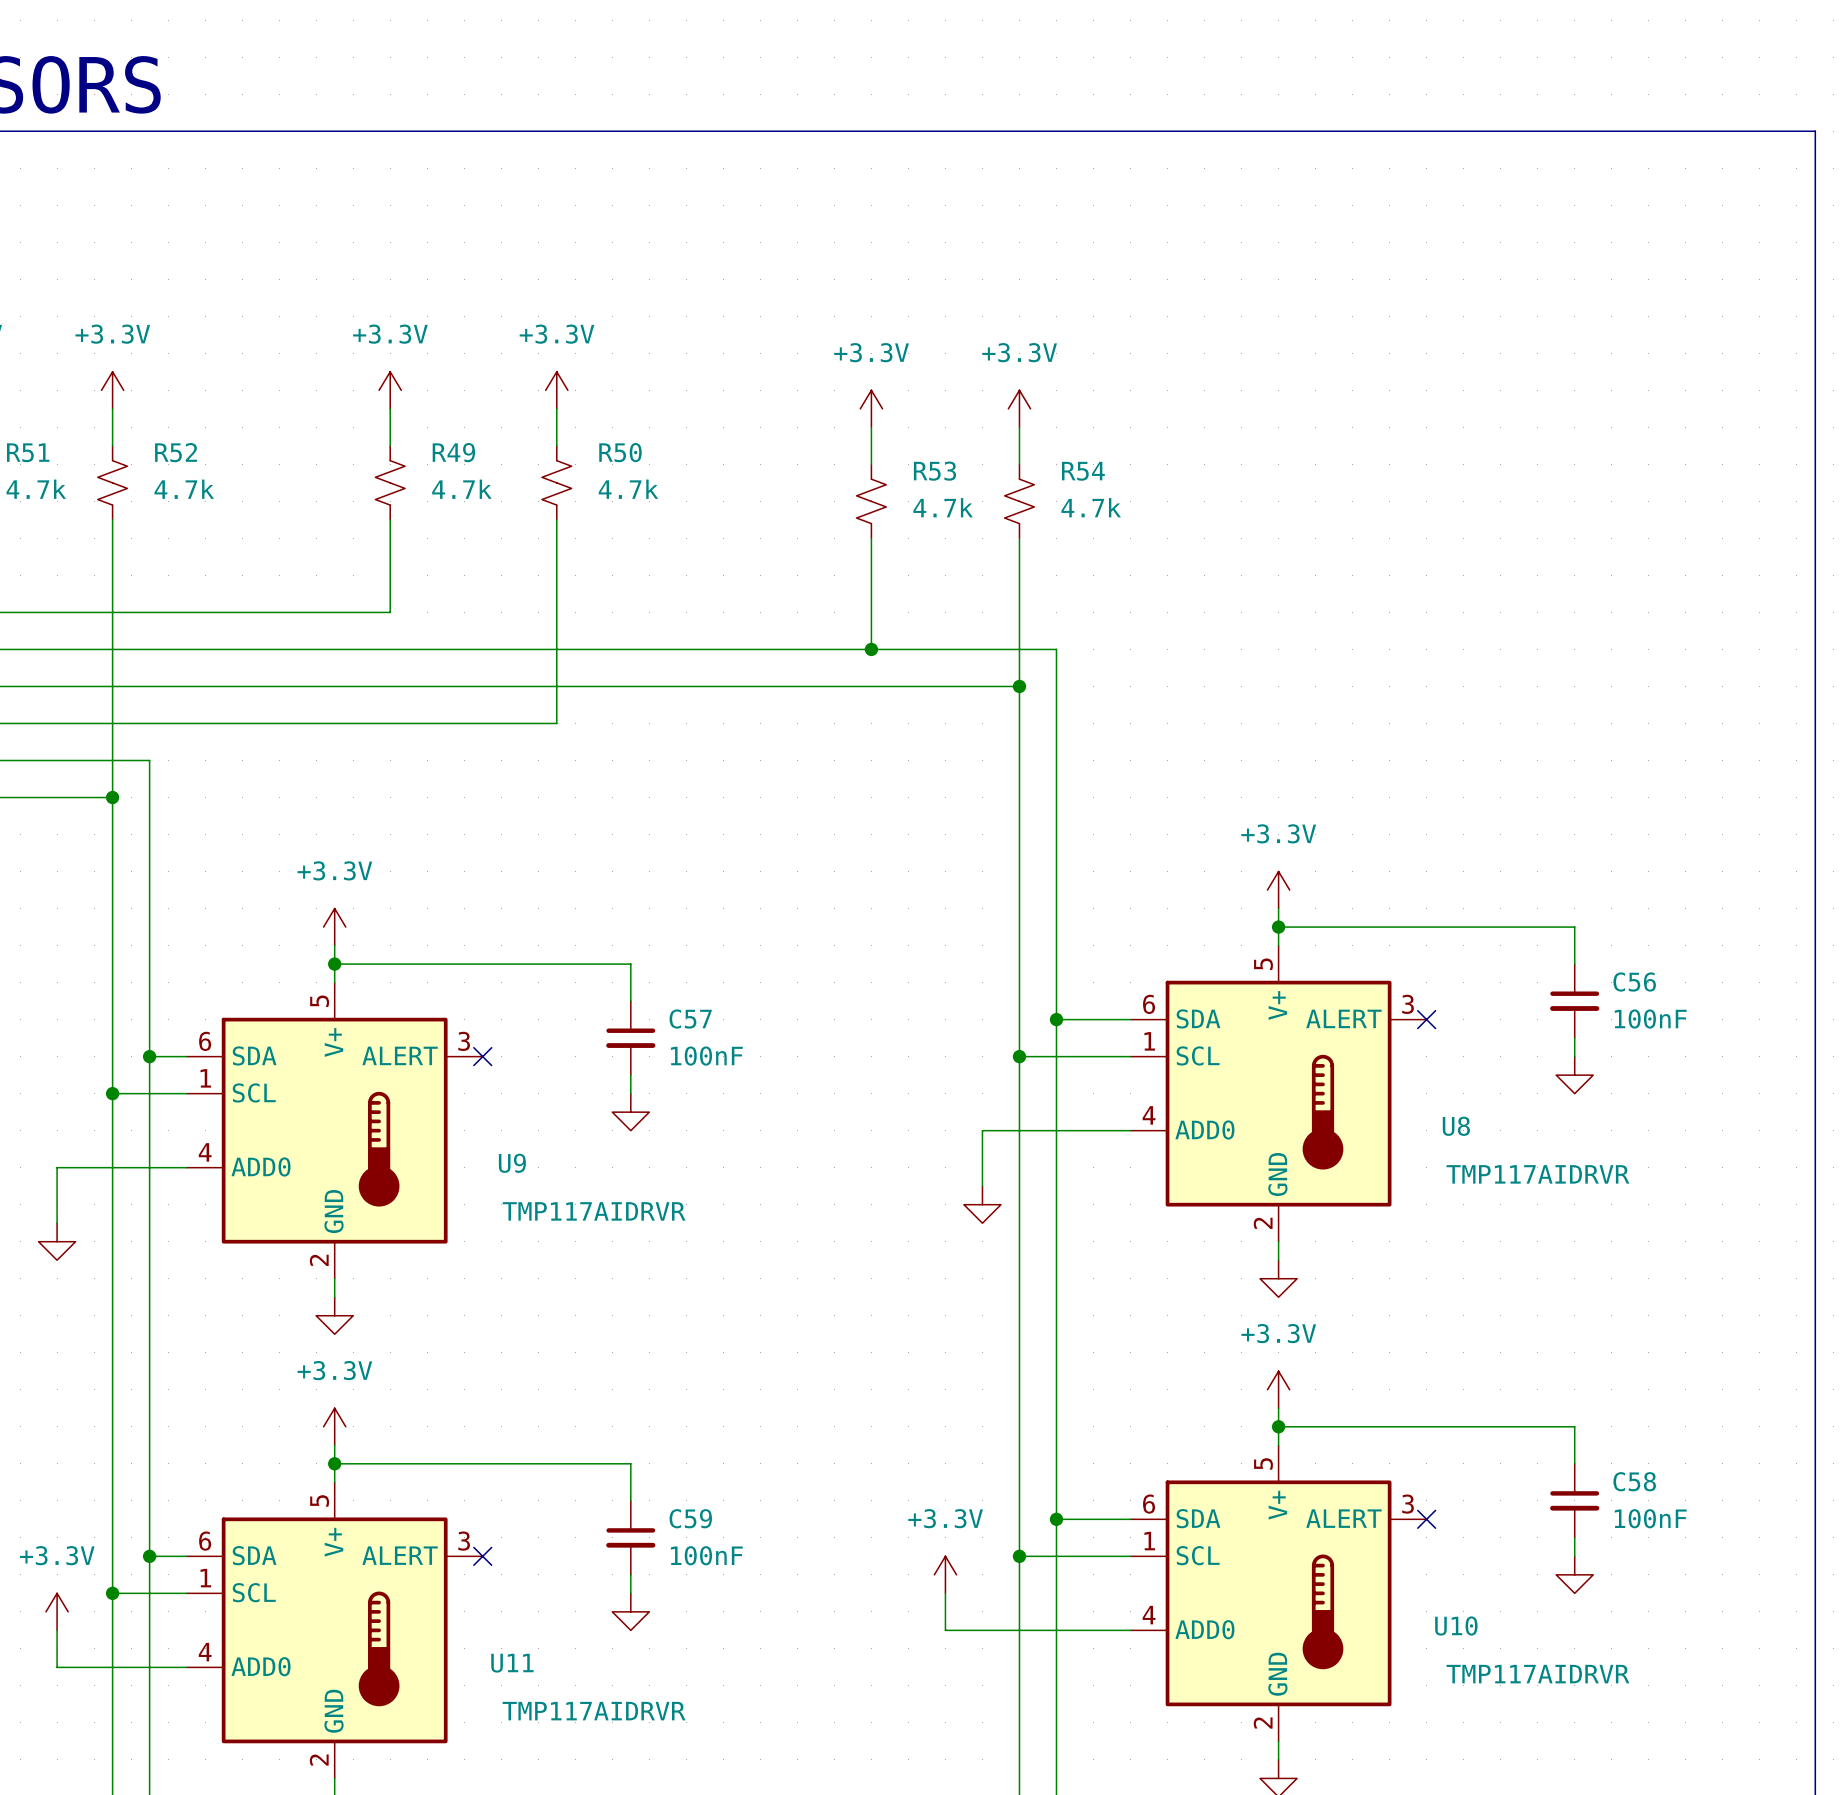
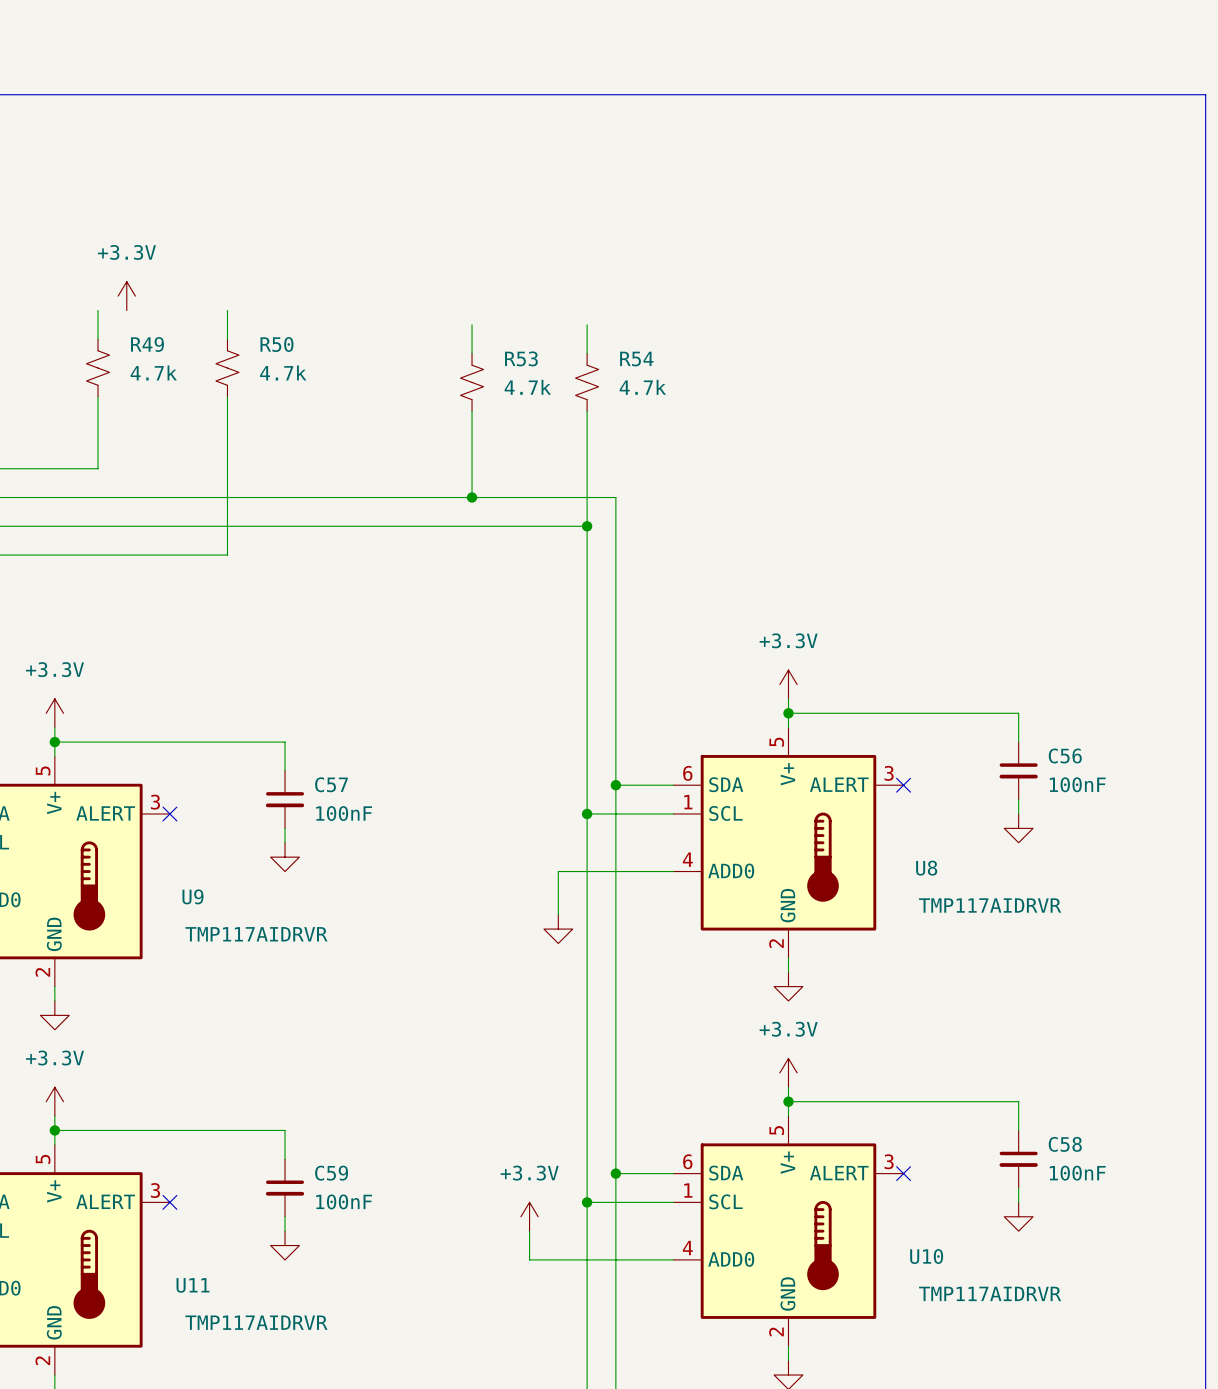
power symbol position: +3.3V (390, 390) -> +3.3V (126, 296)
power symbol: +3.3V (556, 390) -> none
power symbol: +3.3V (871, 408) -> none
power symbol: +3.3V (1019, 408) -> none

